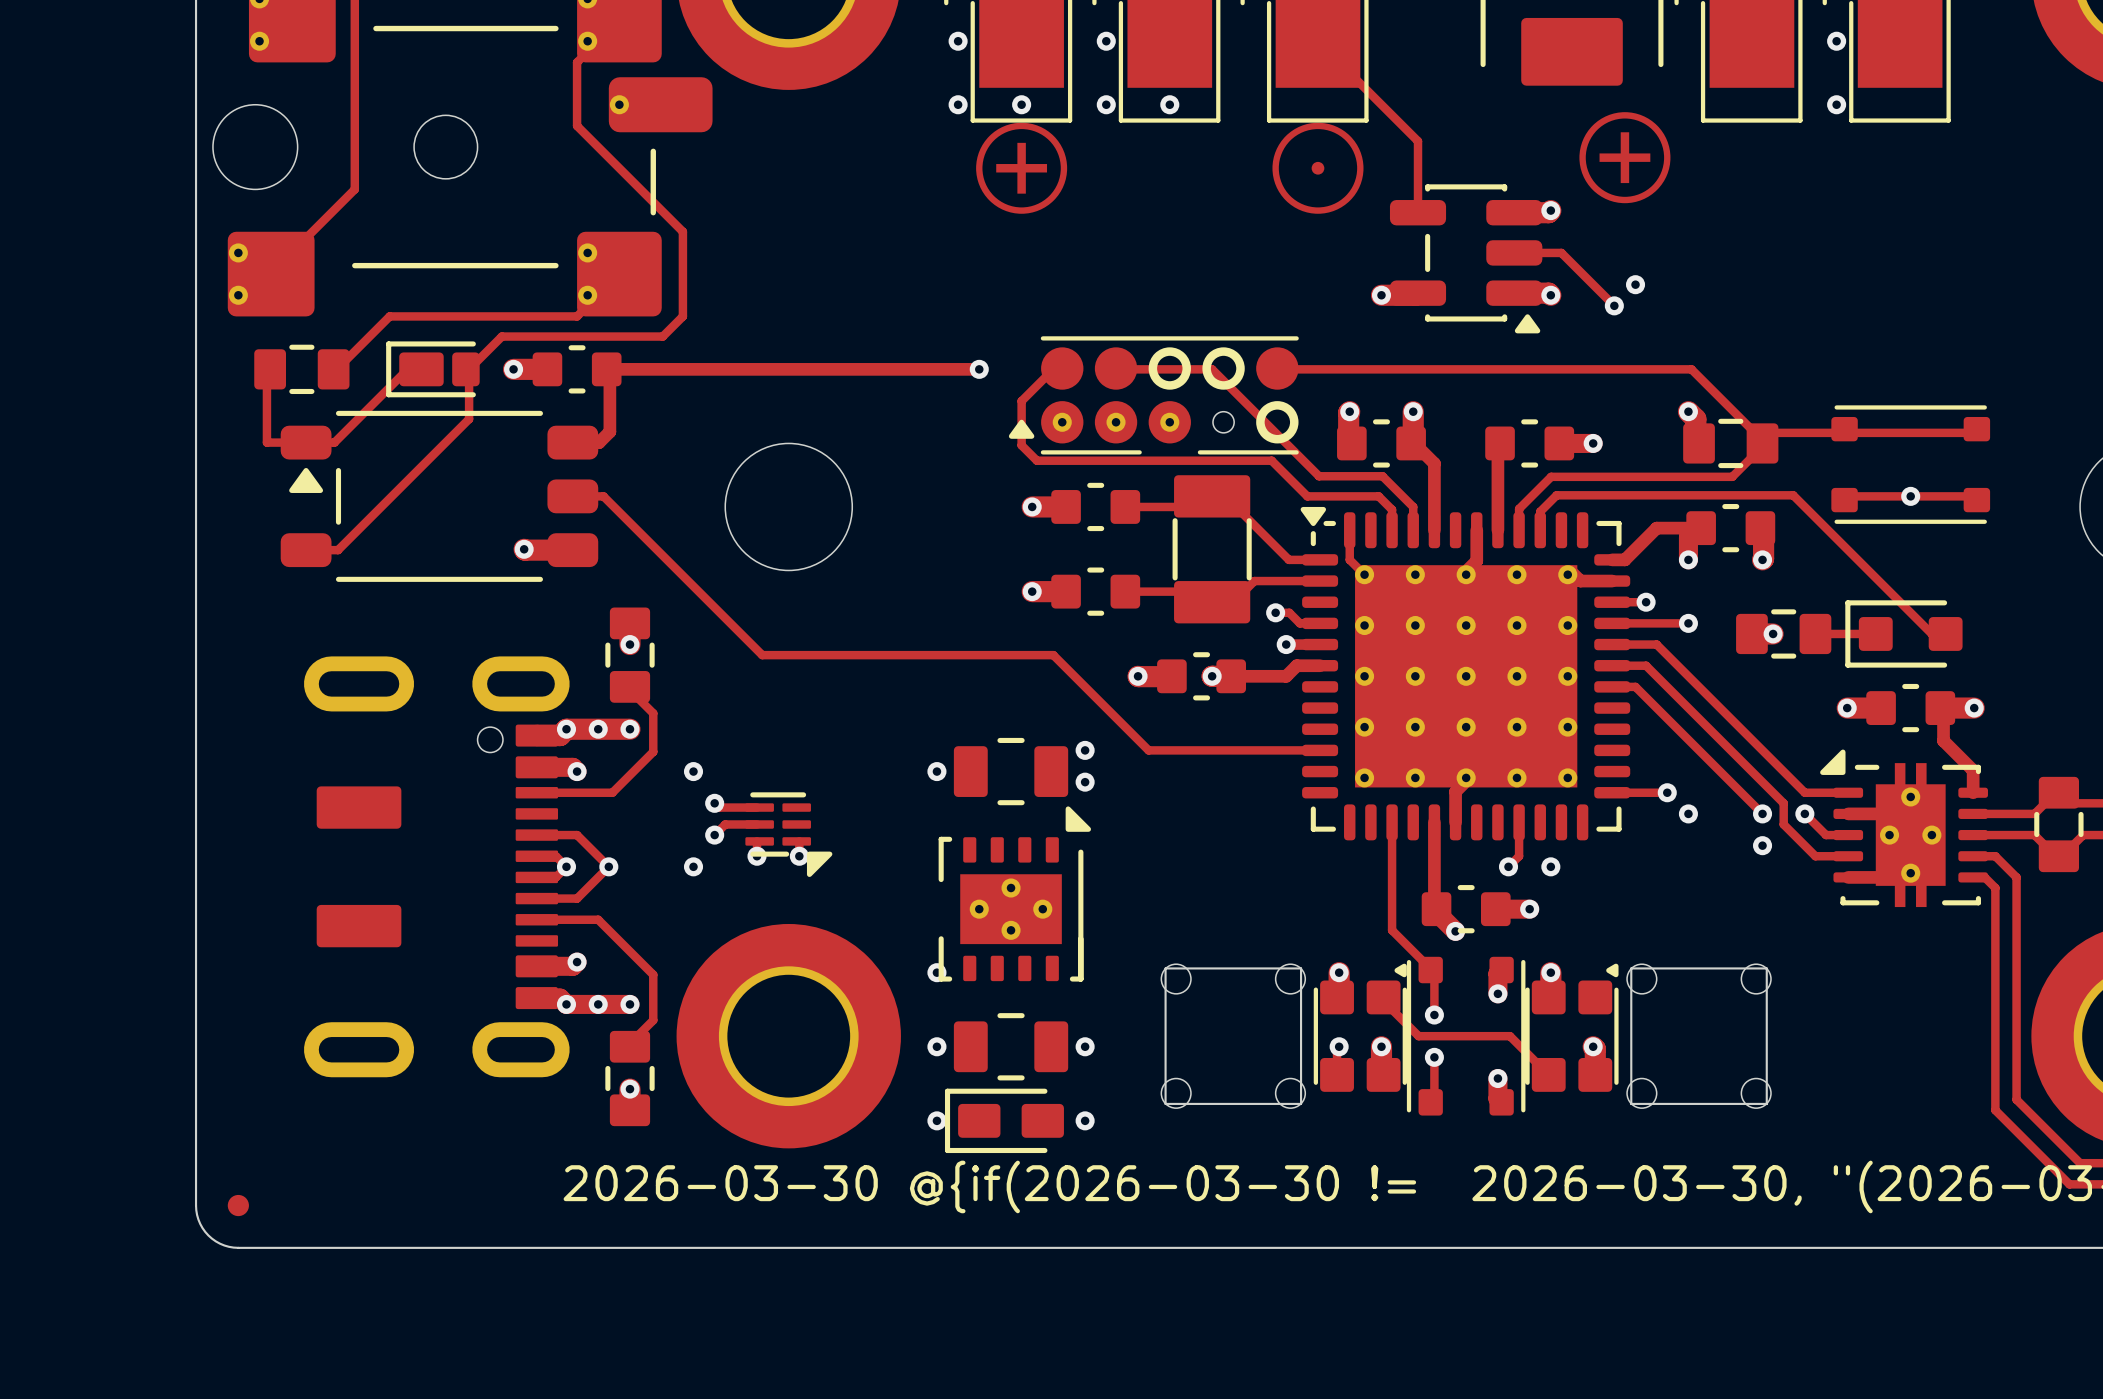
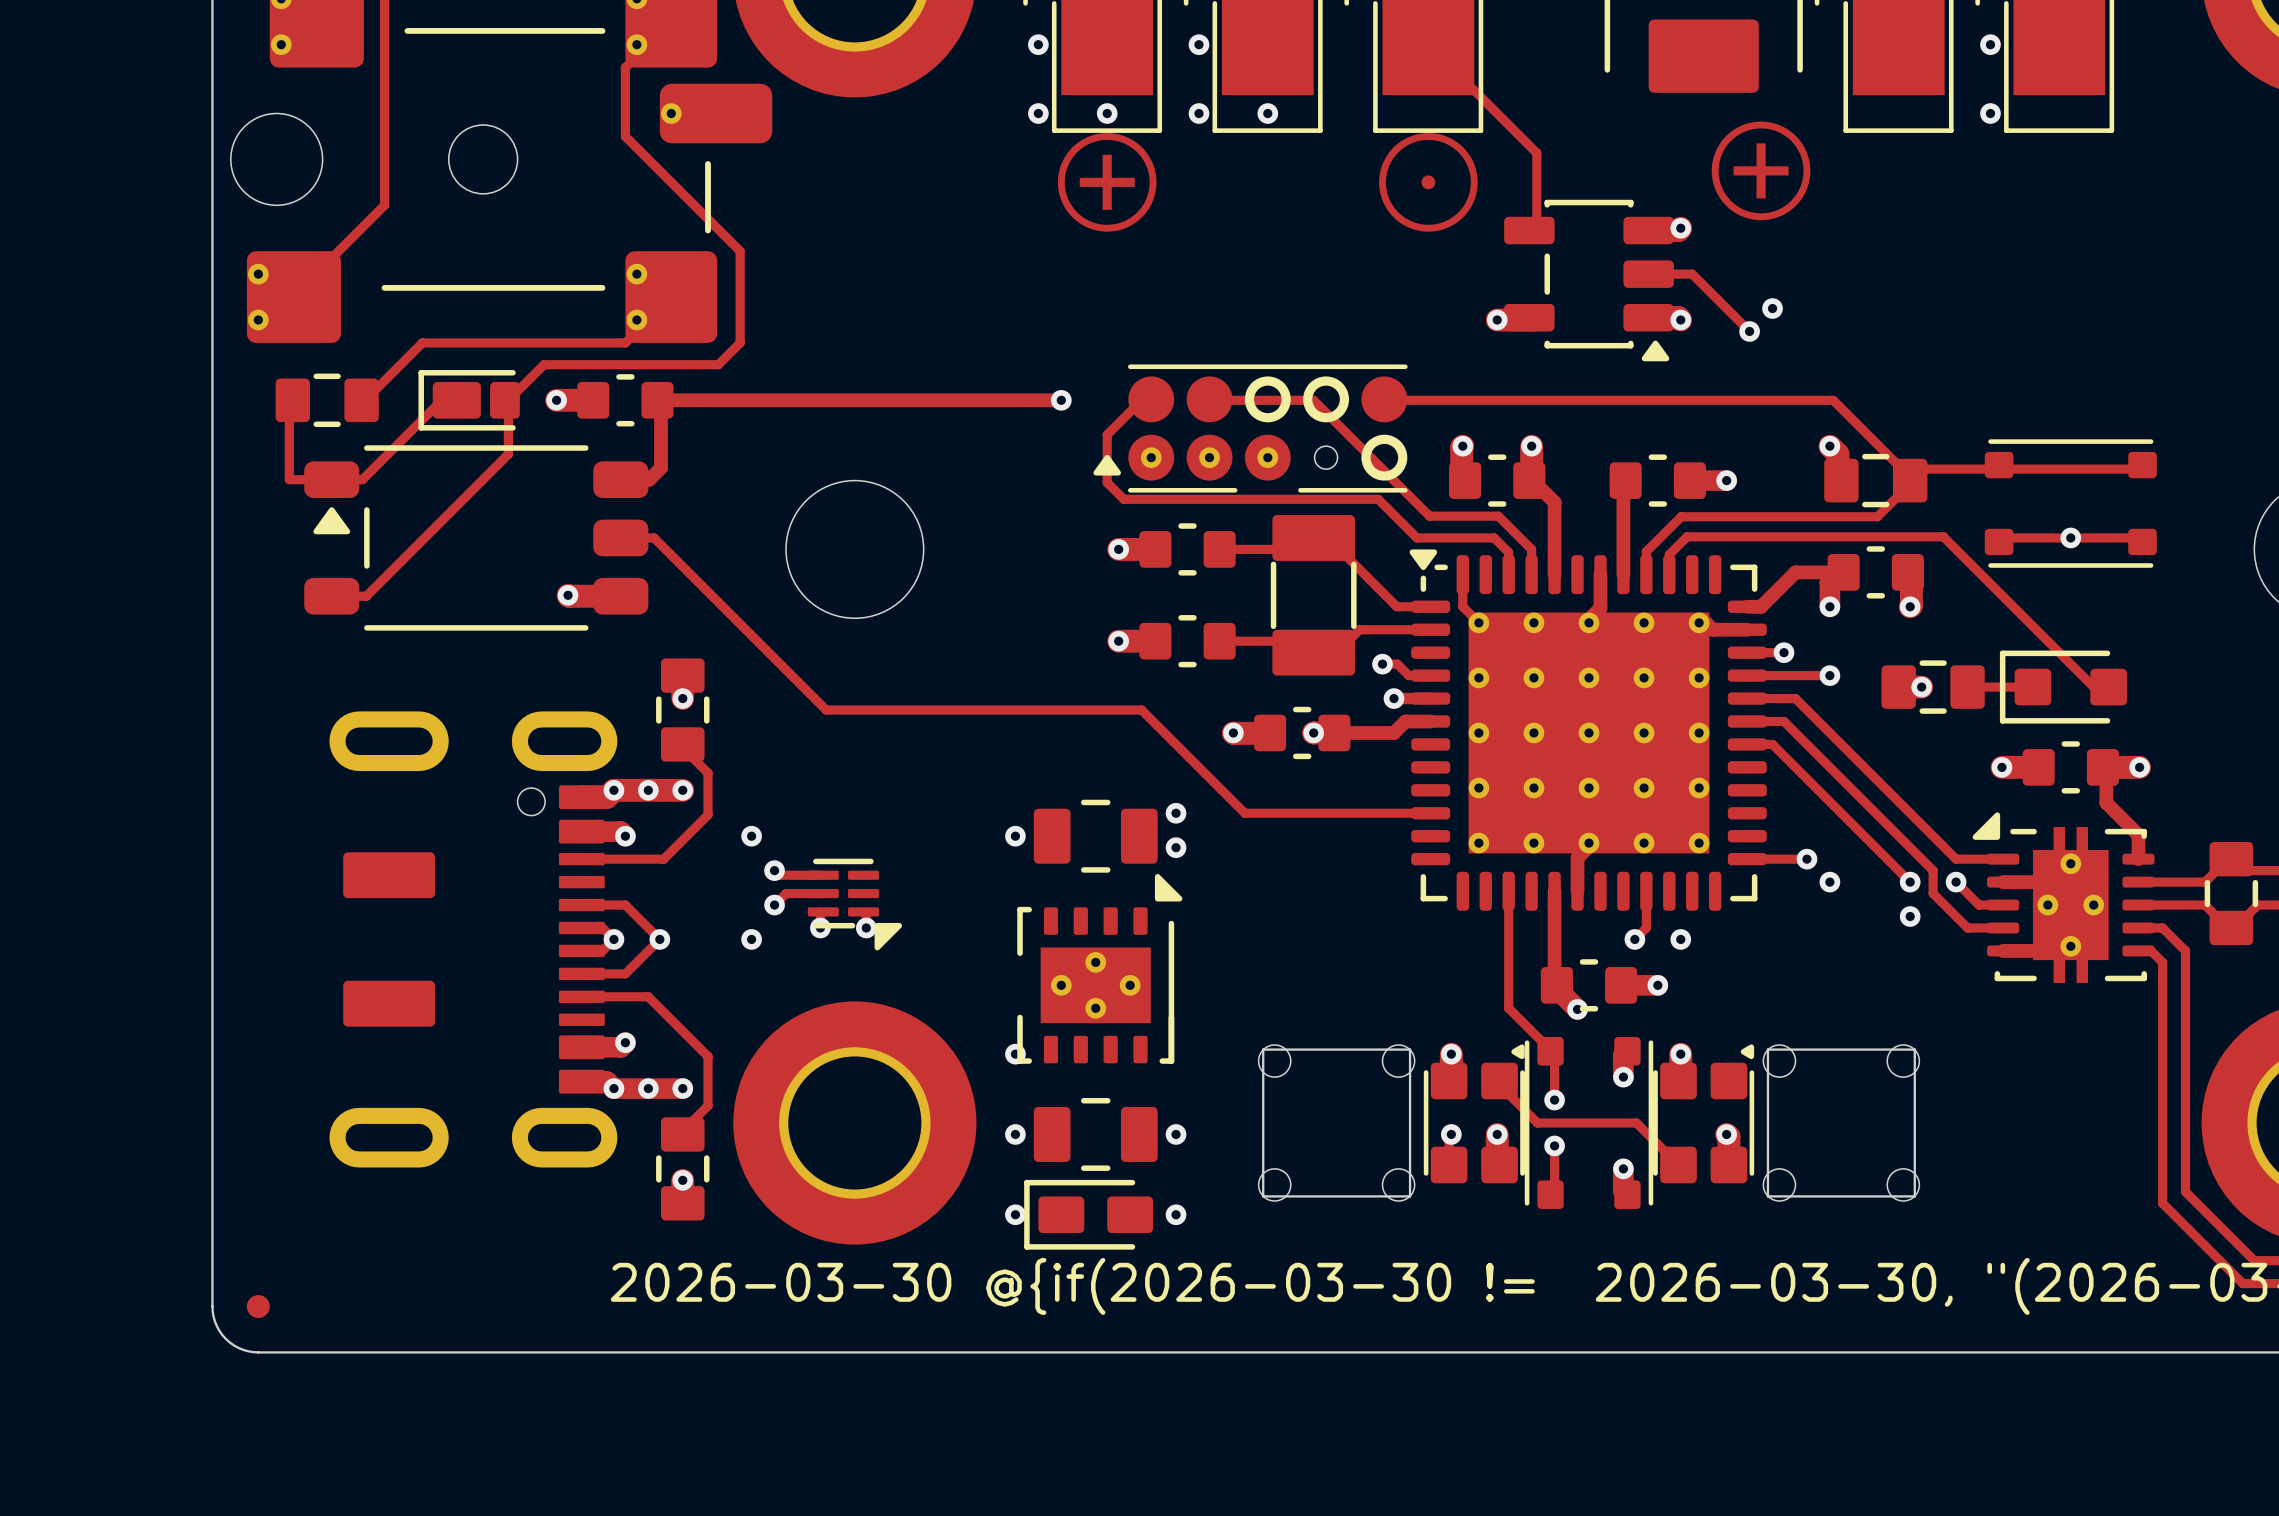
part footprint: [1389, 184, 1543, 334] -> [1504, 199, 1674, 362]

